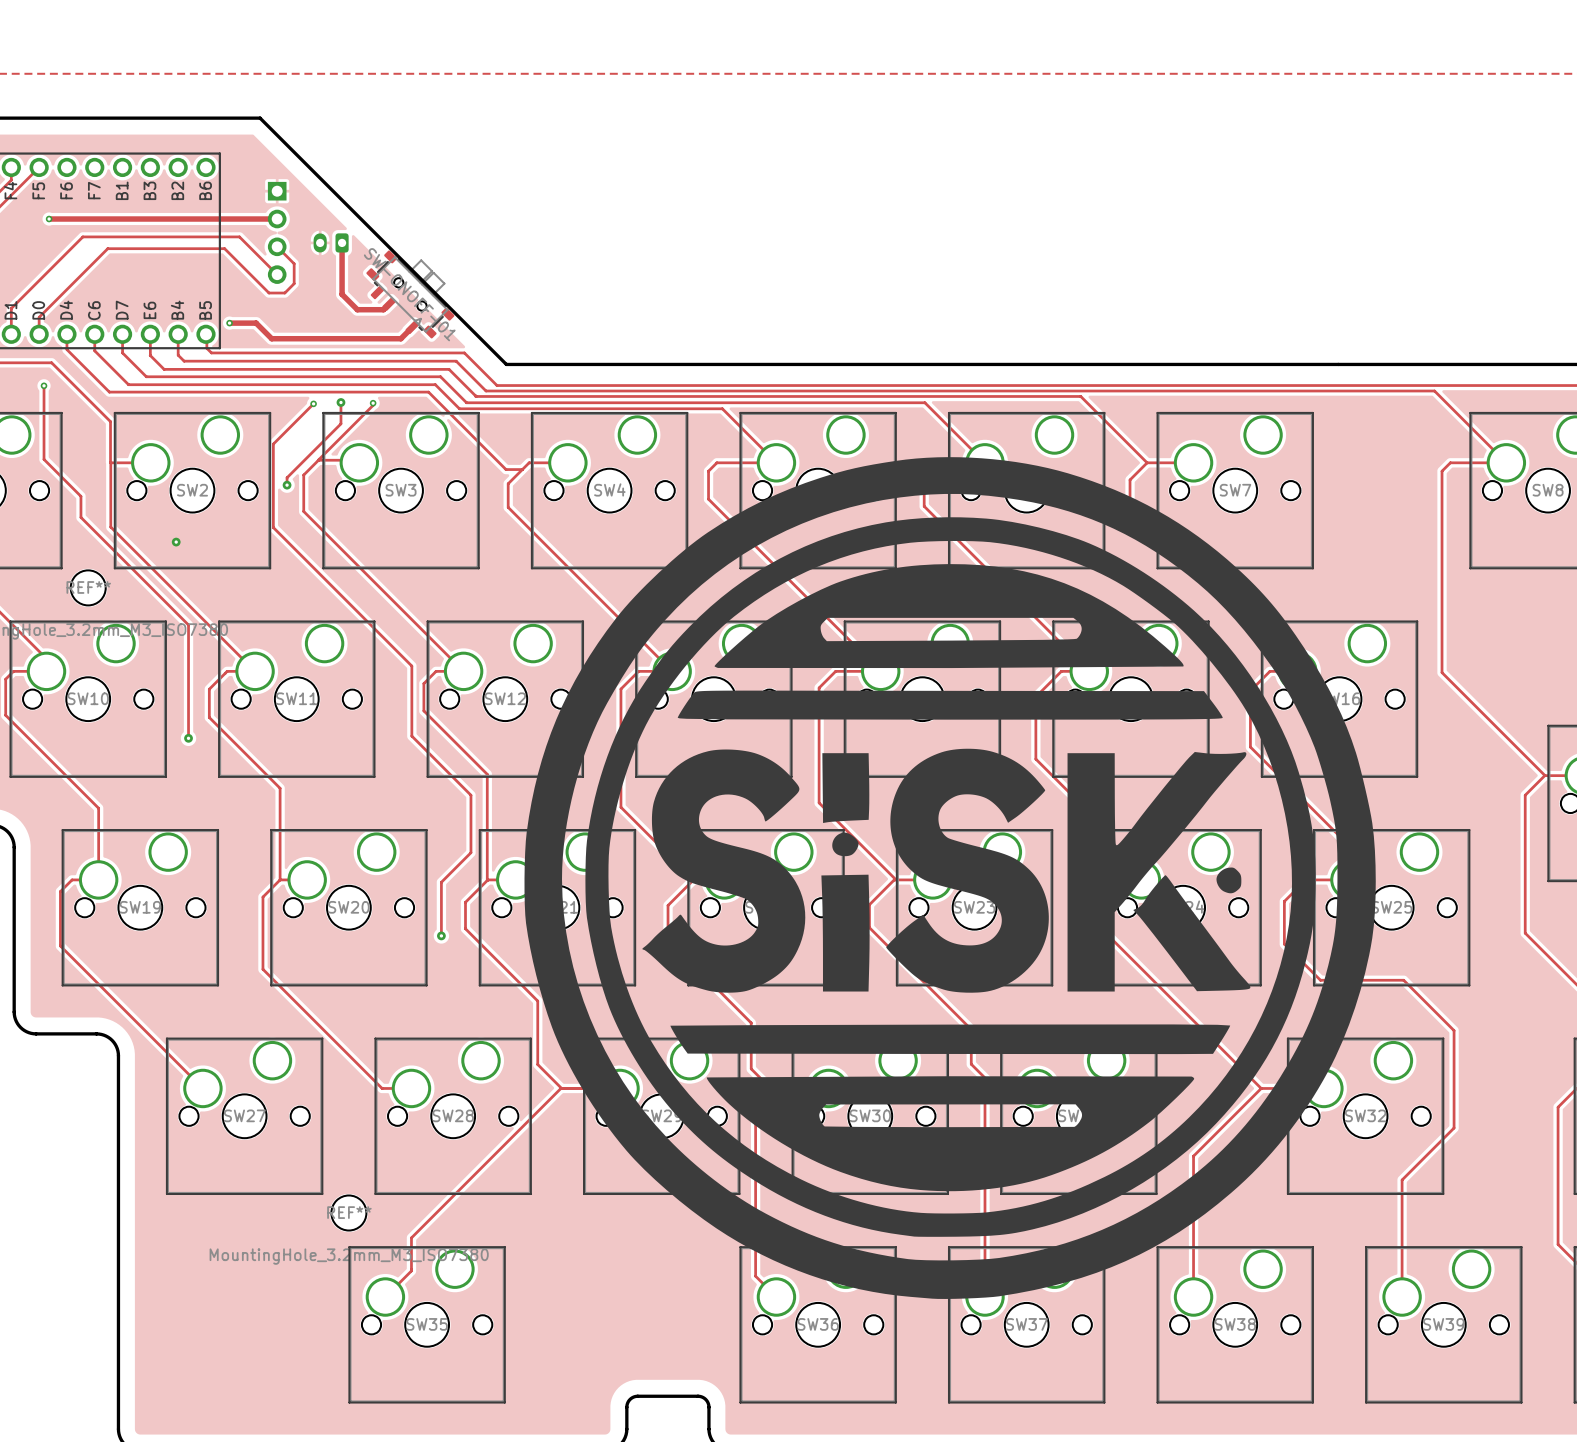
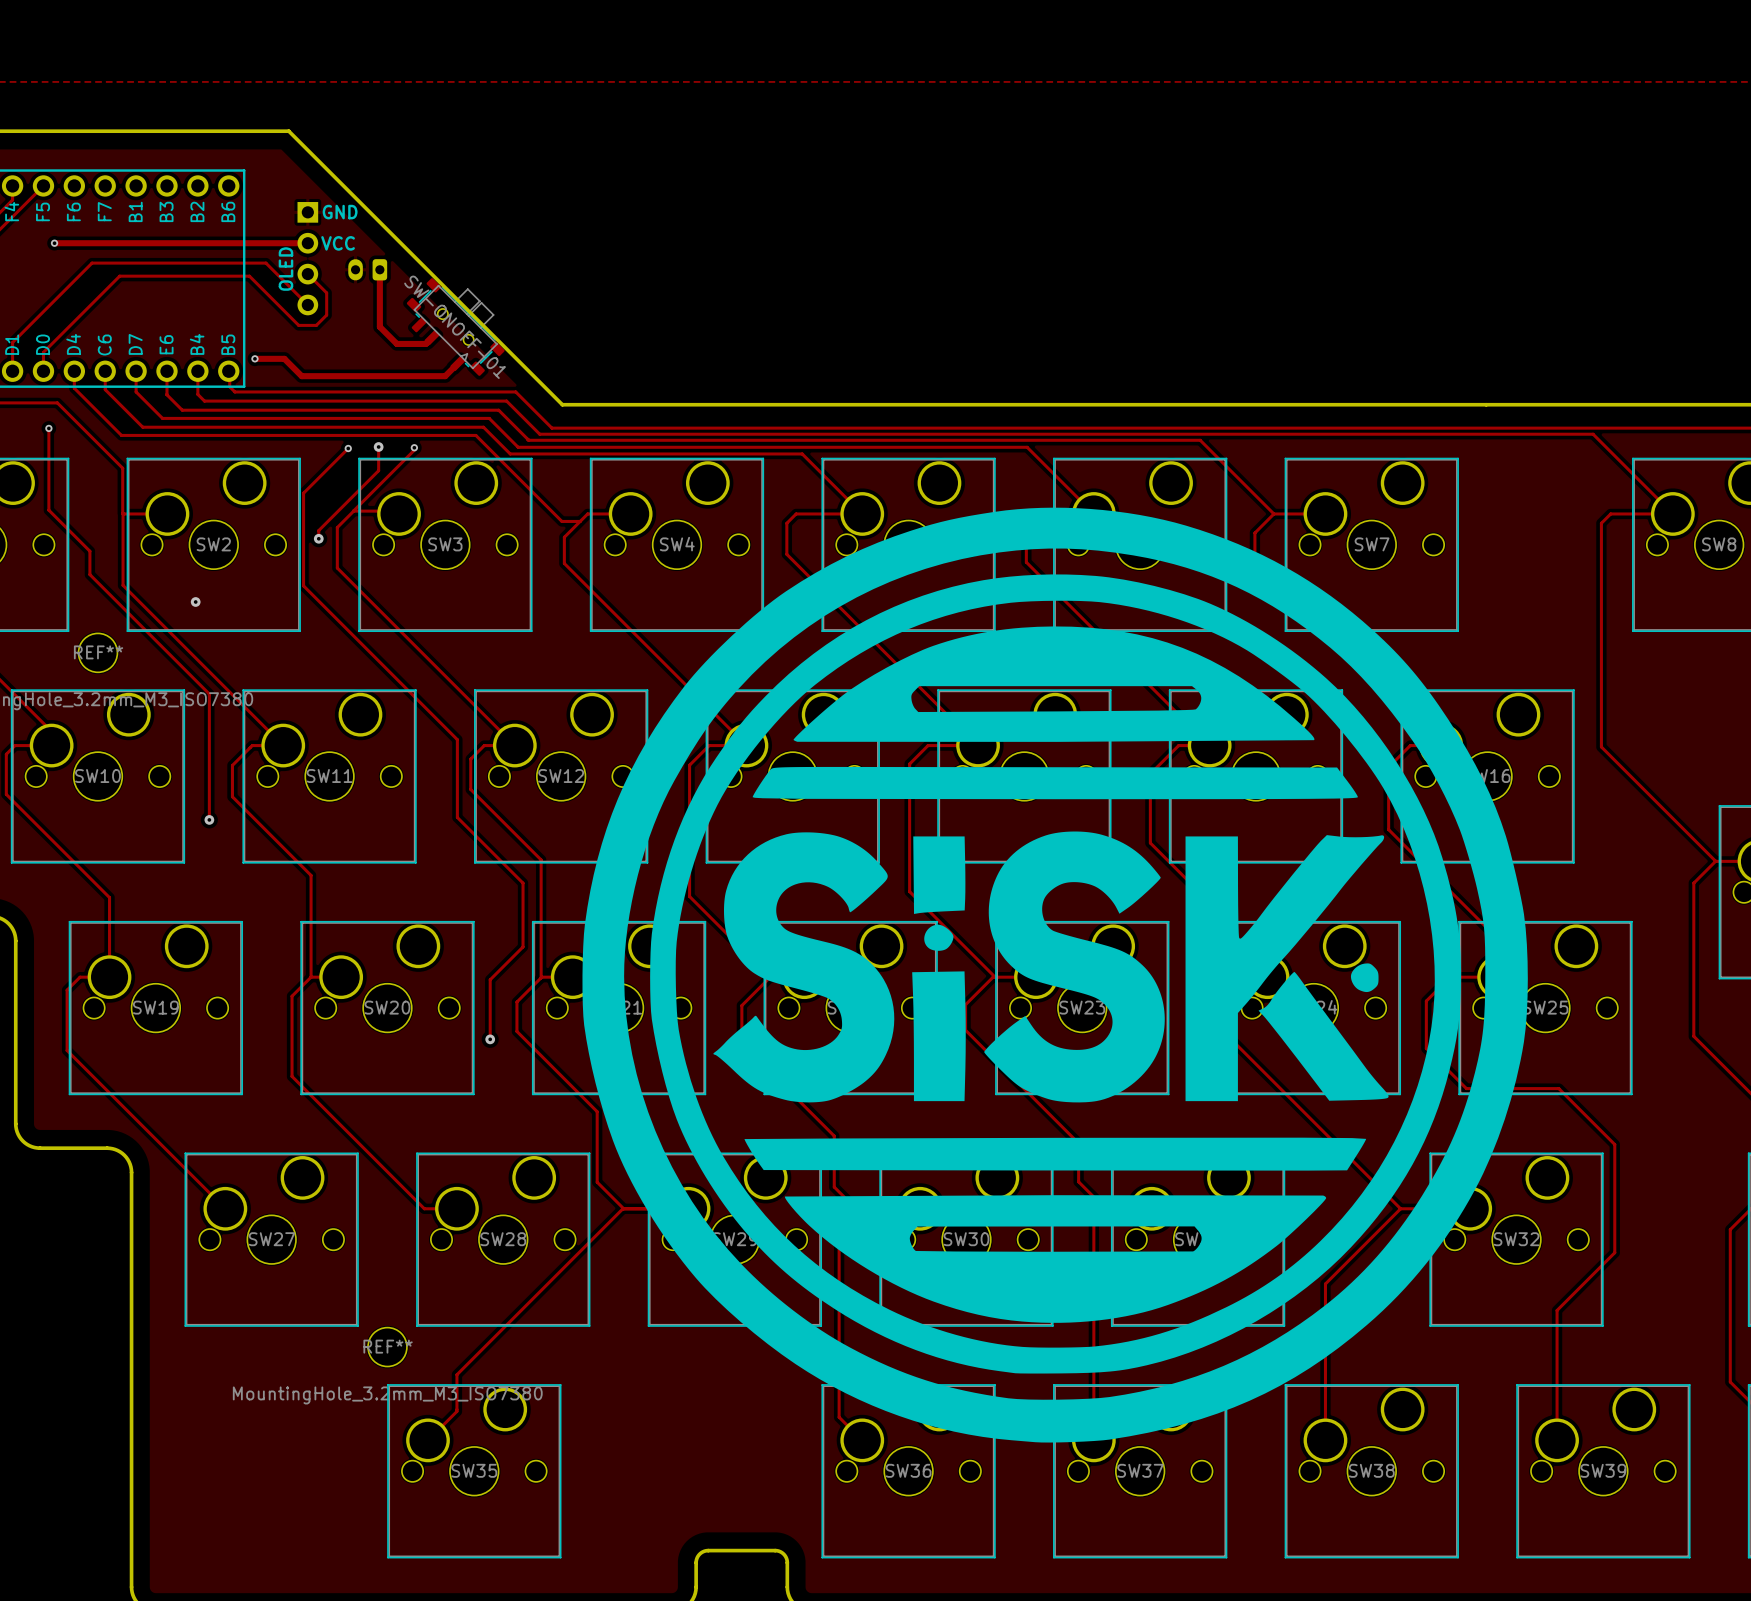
text: none -> GND (340, 212)
text: none -> VCC (338, 243)
text: none -> OLED (285, 269)

